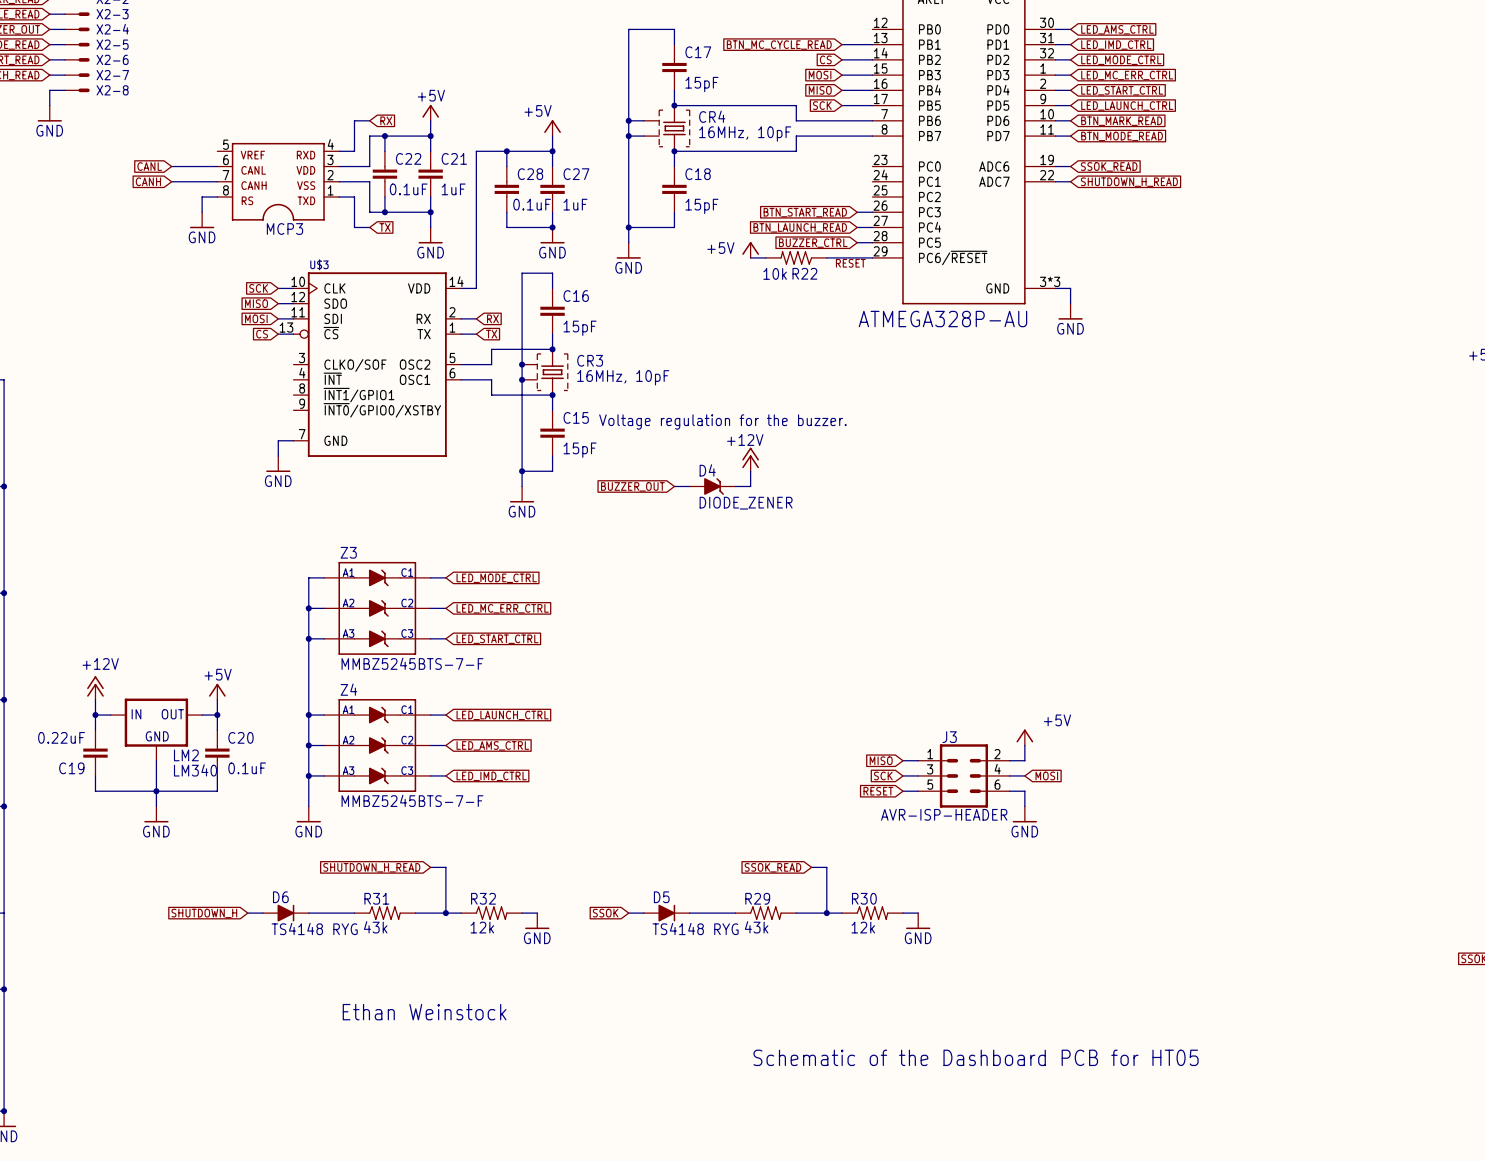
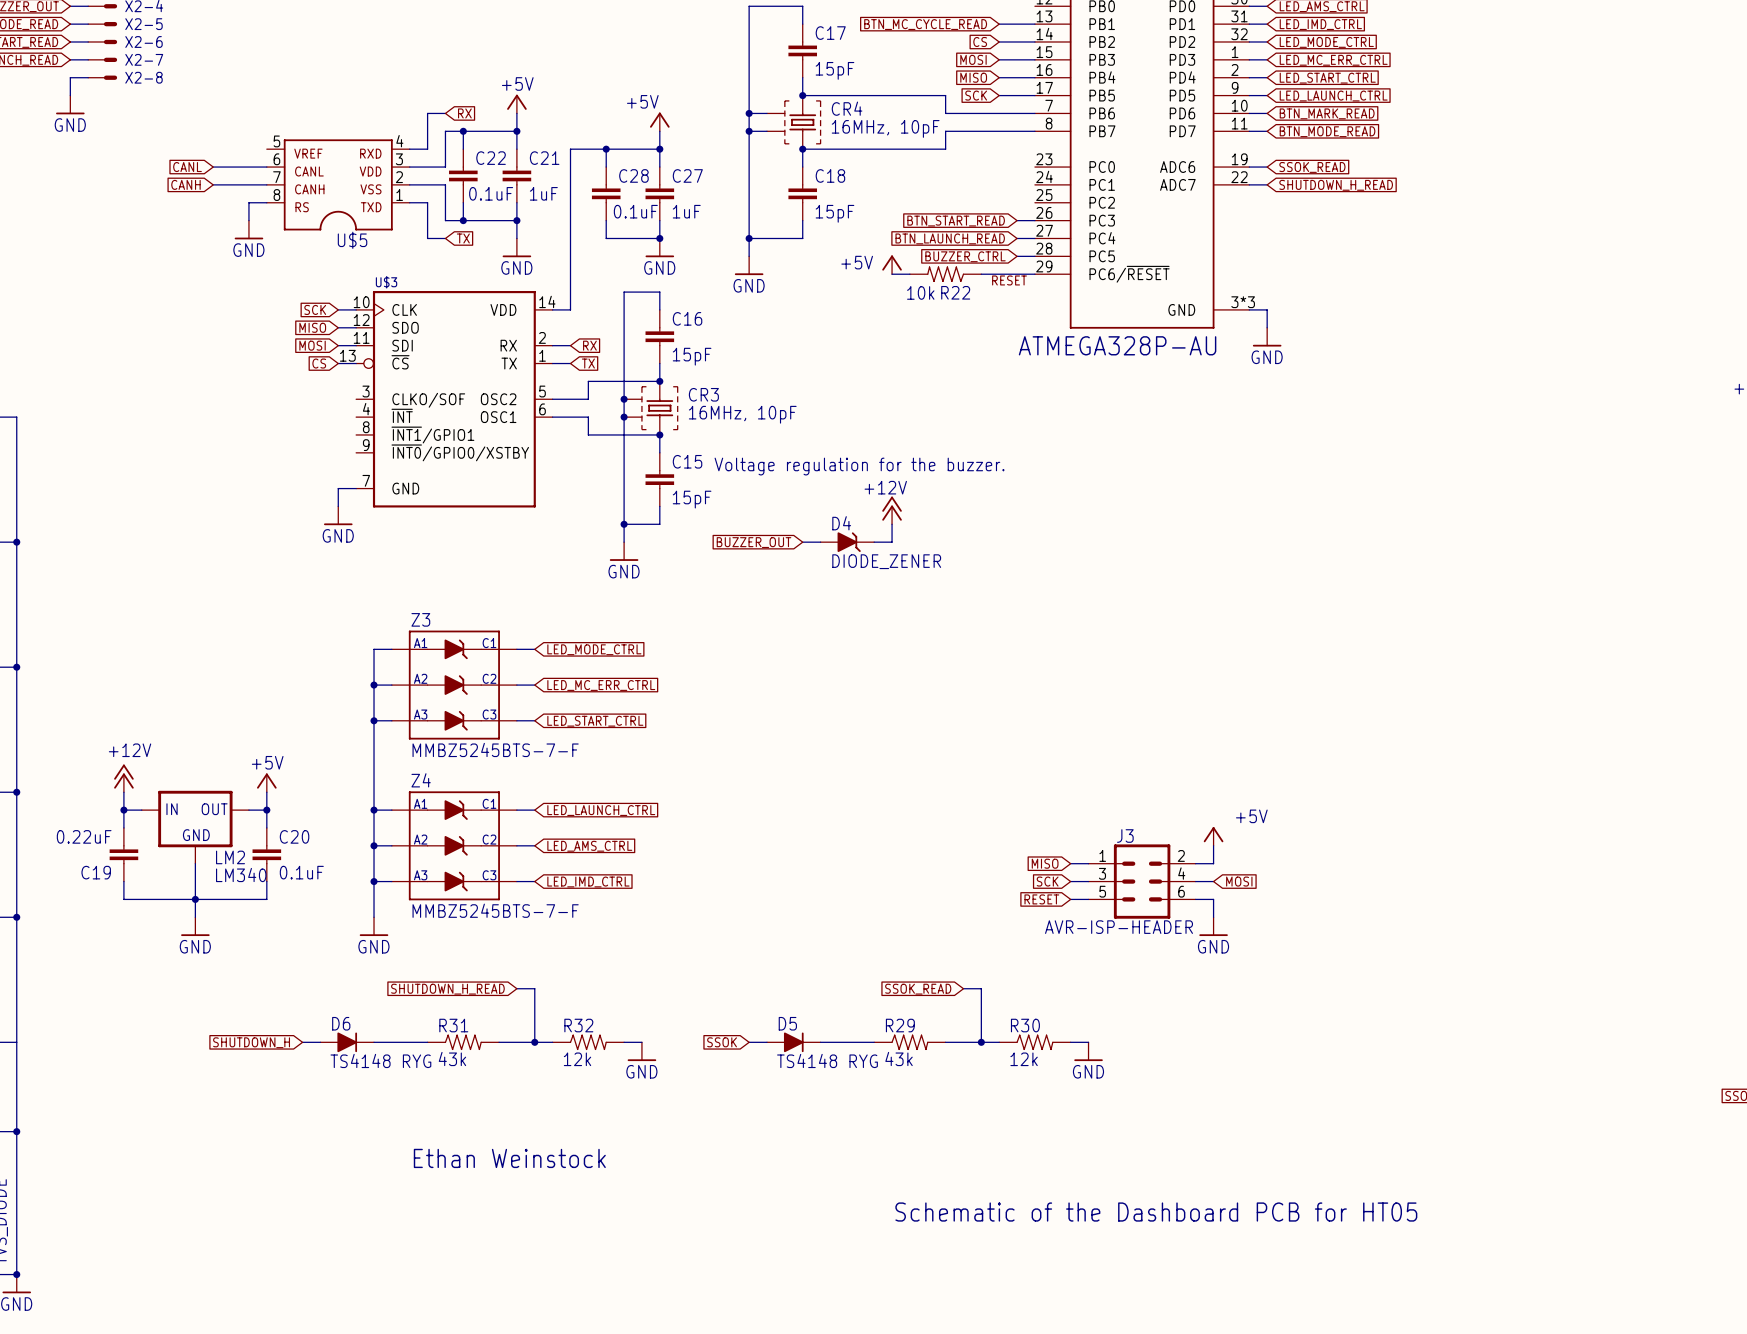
MCP3 name: MCP3 (284, 229) -> U$5 (352, 240)

